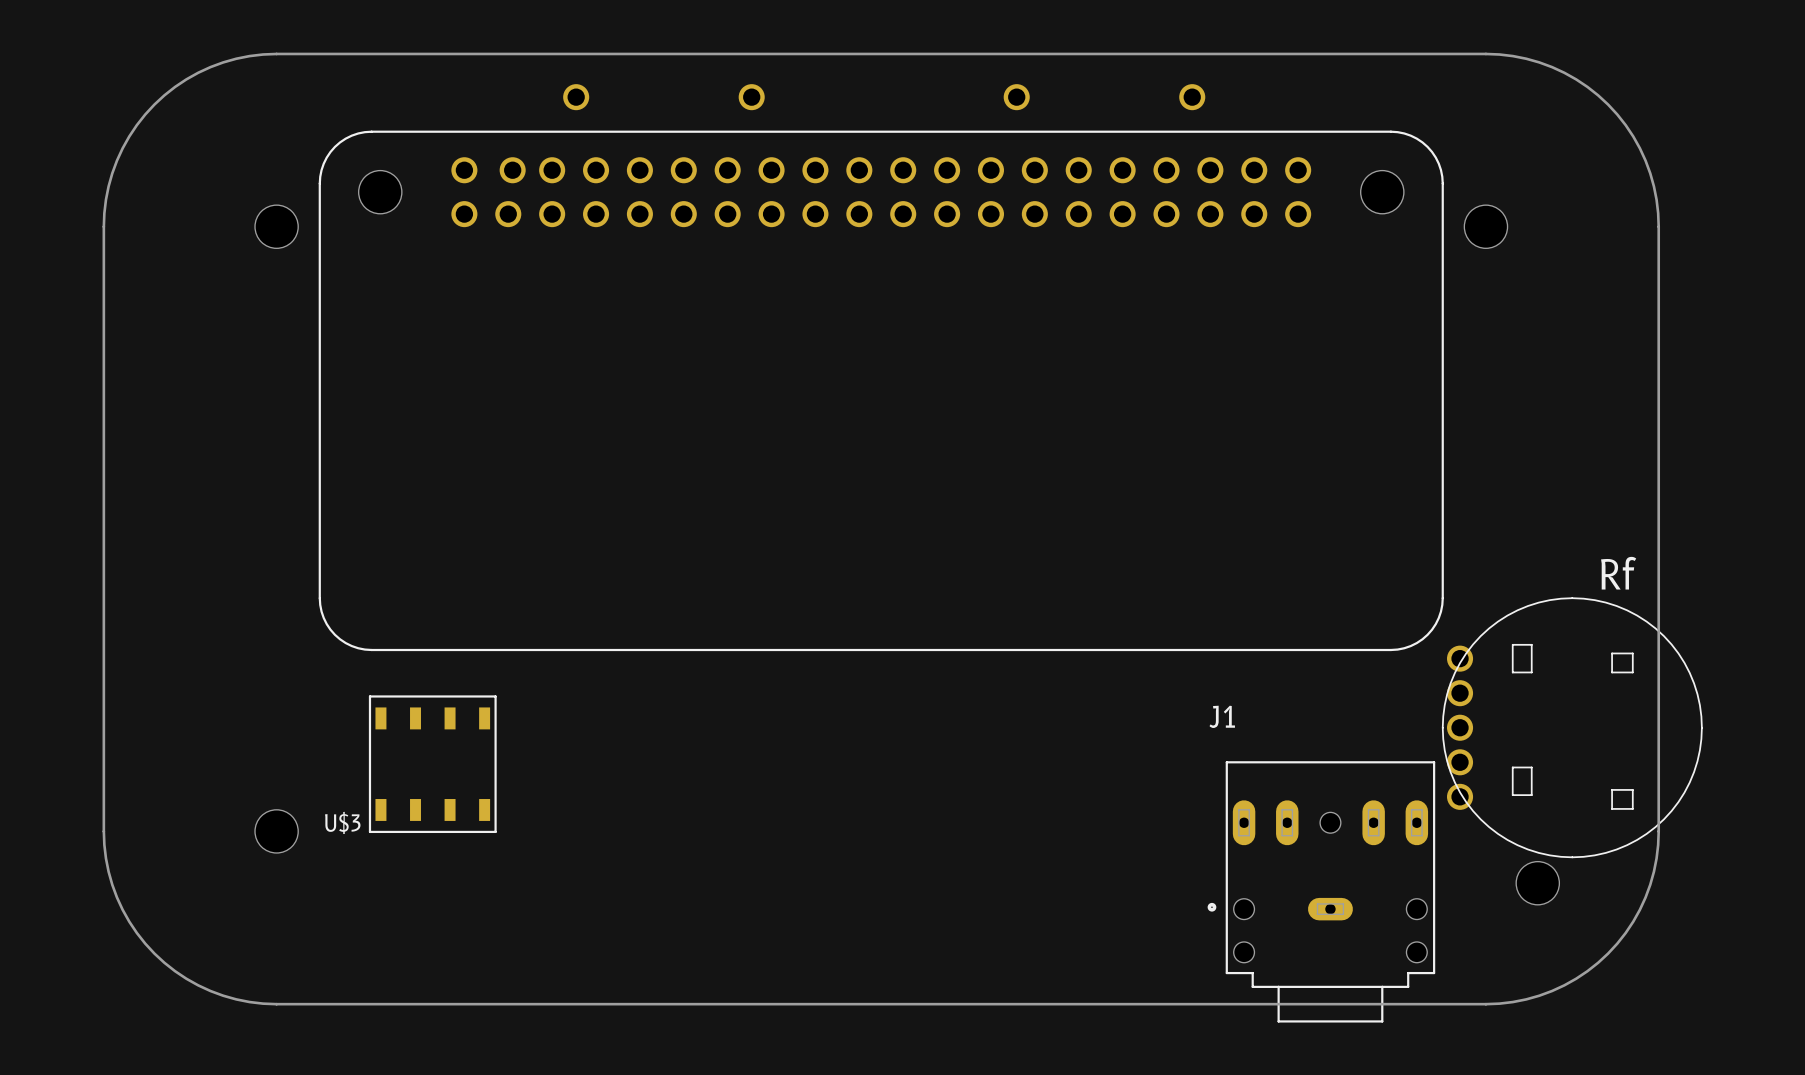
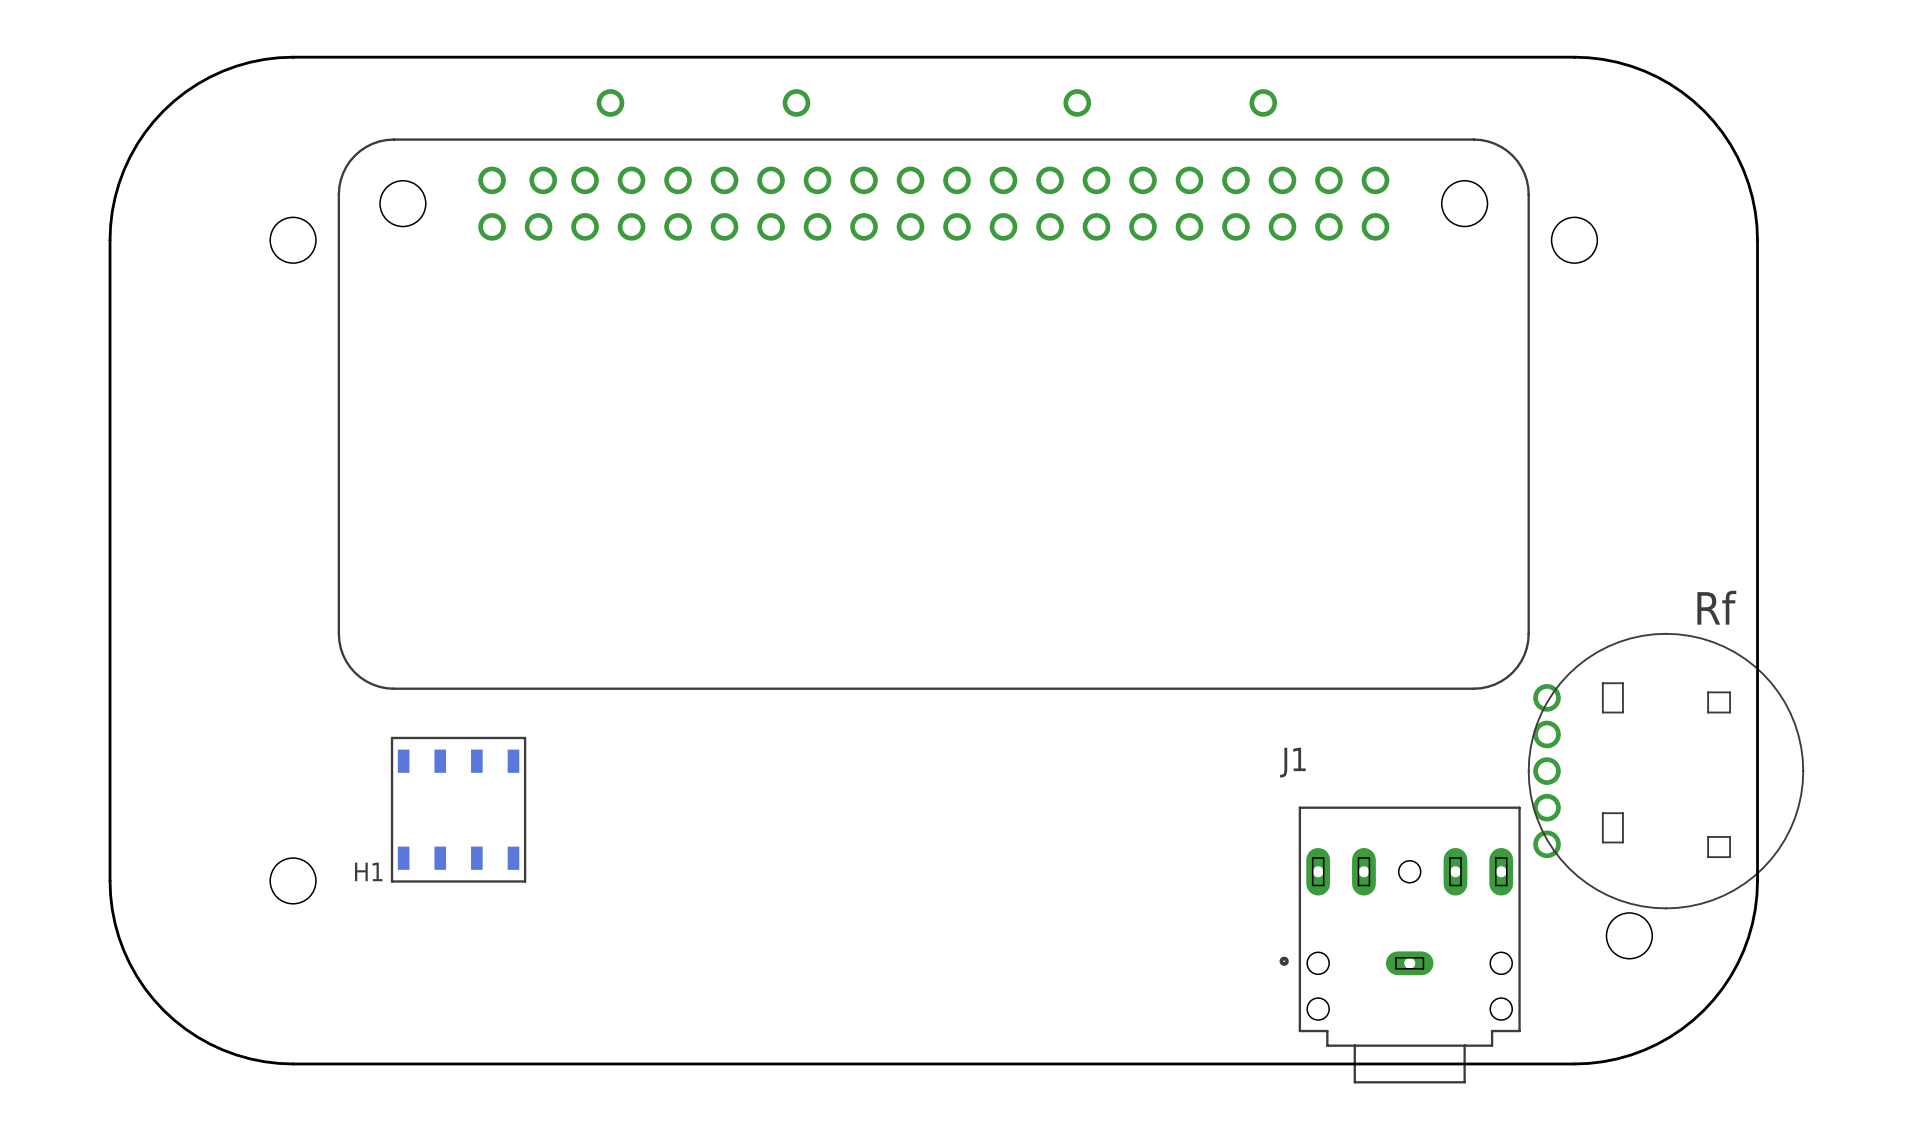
U$3 name: U$3 (342, 822) -> H1 (368, 871)

